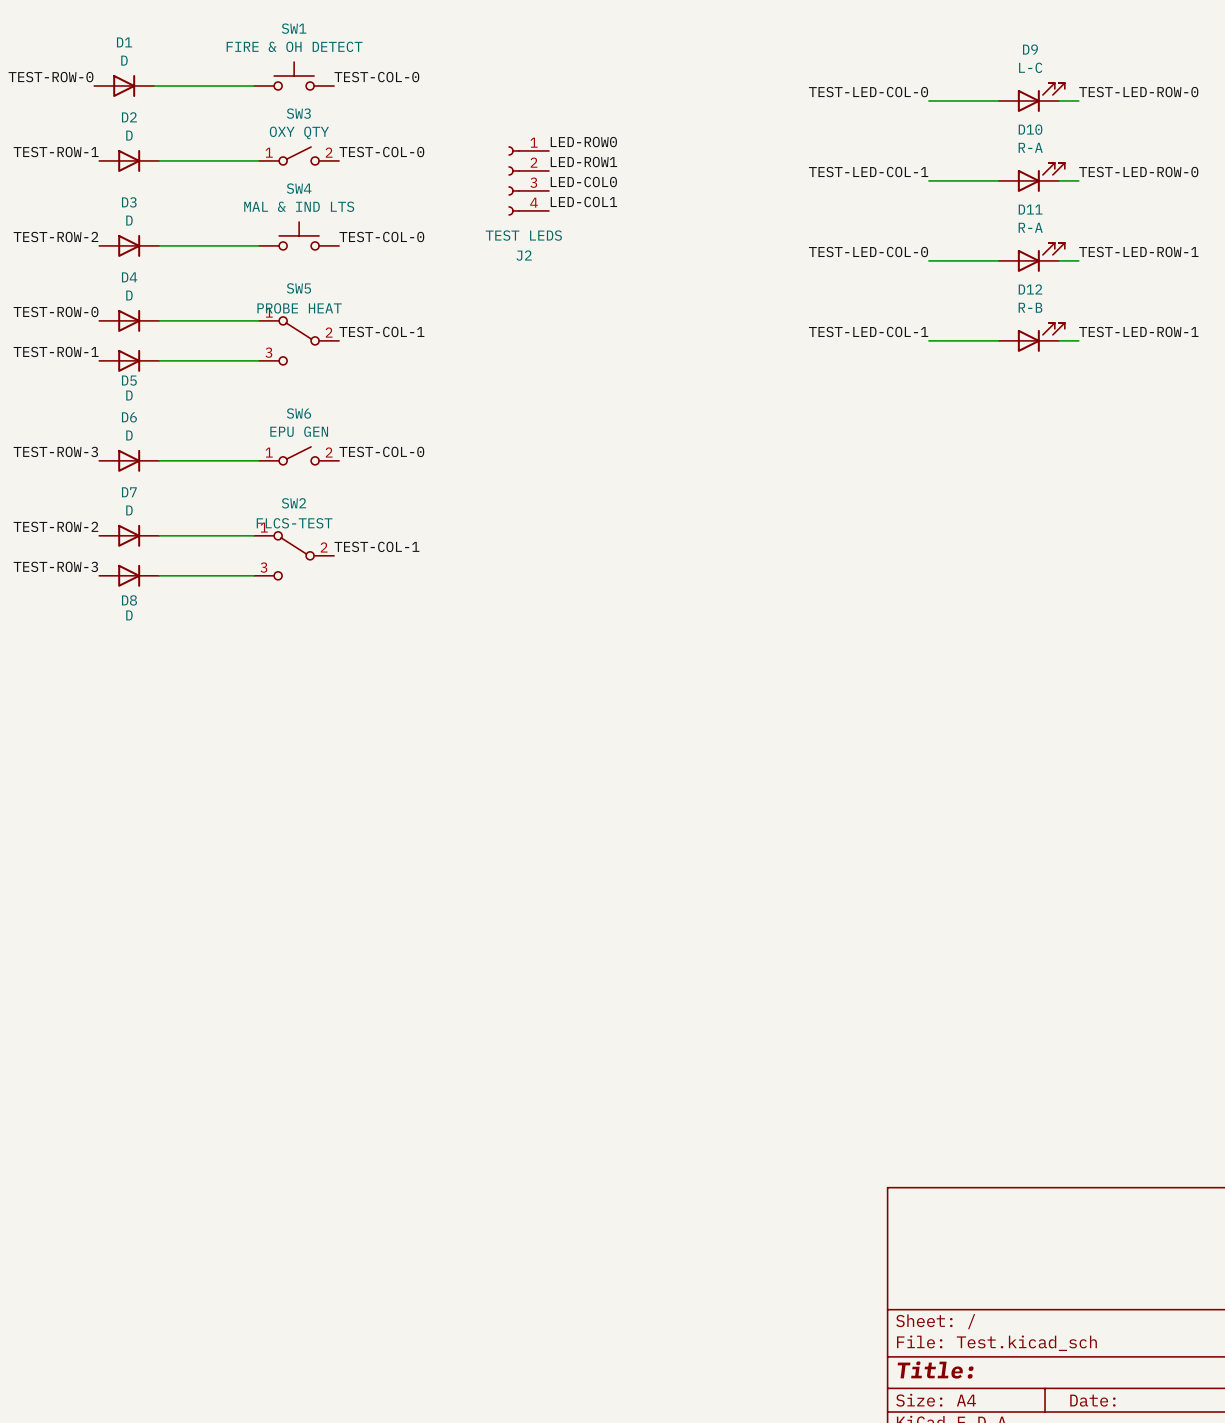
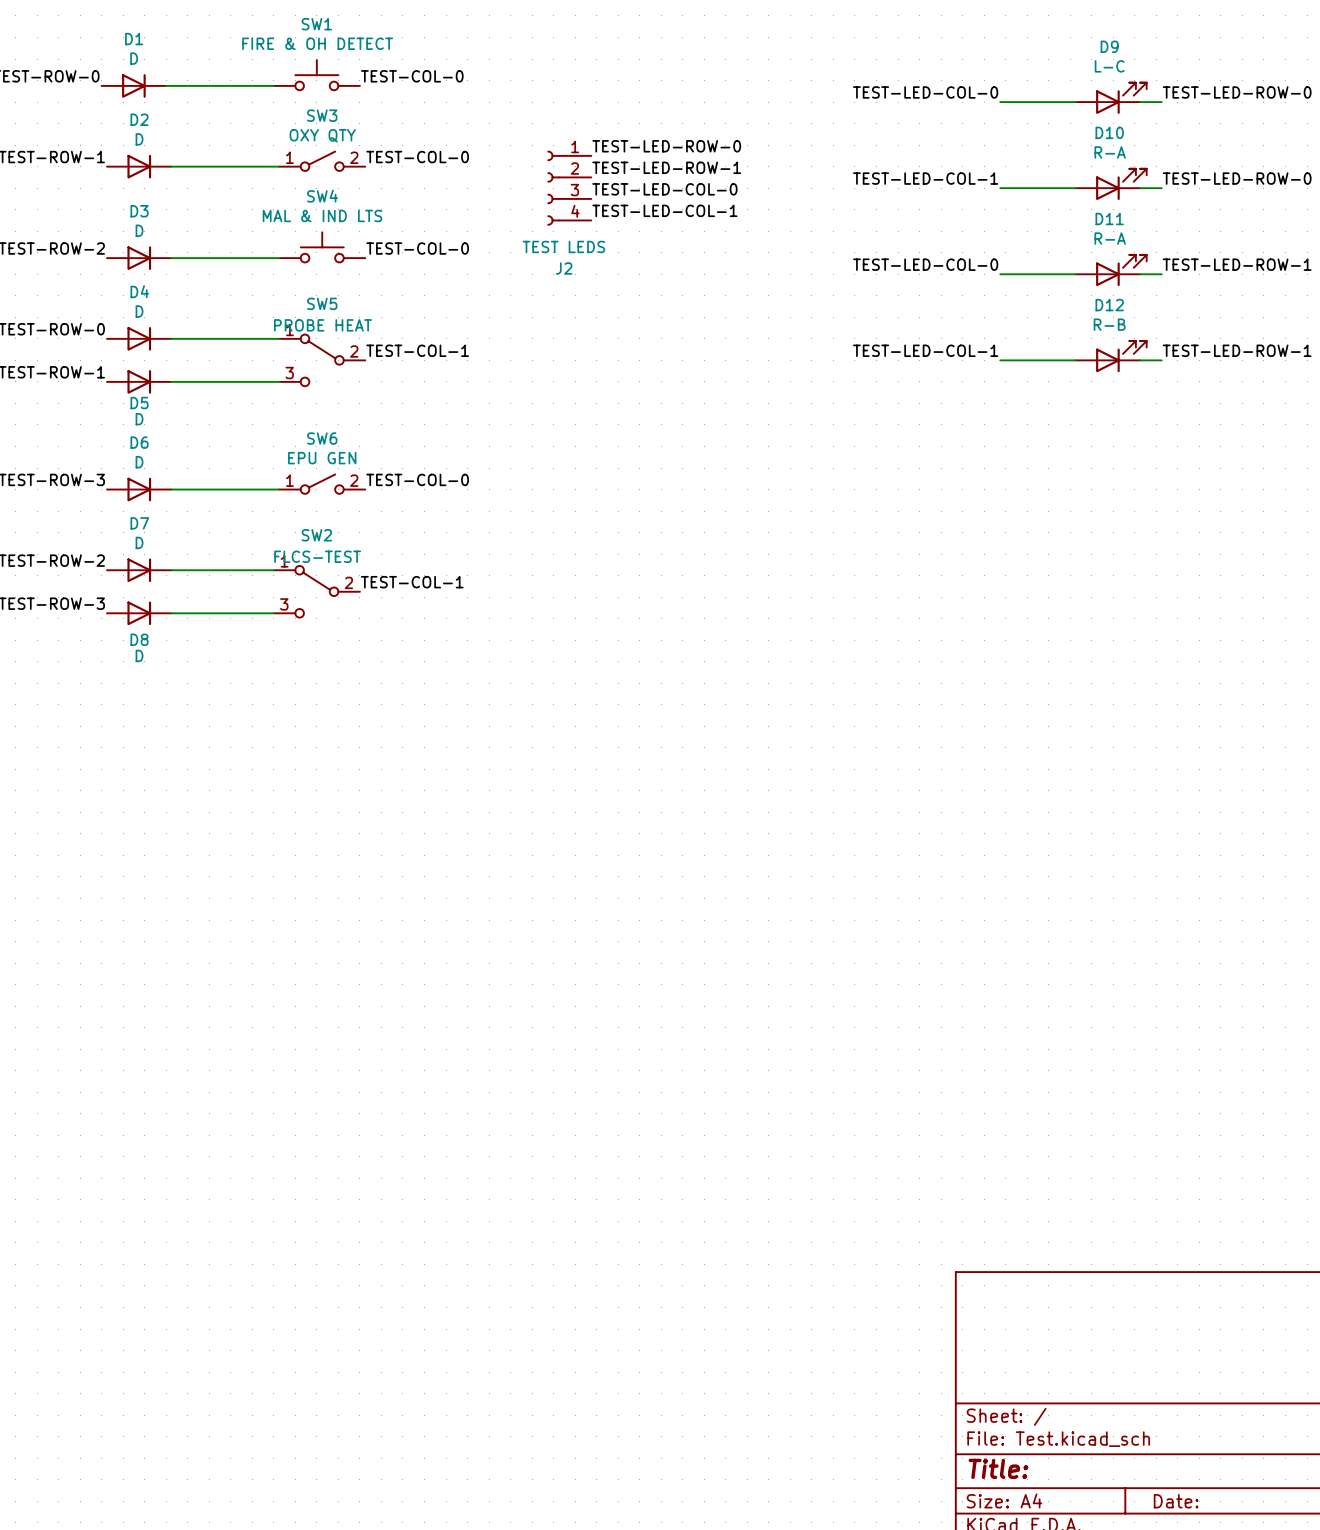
label: LED-ROW0 (583, 142) -> TEST-LED-ROW-0 (666, 146)
label: LED-ROW1 (583, 162) -> TEST-LED-ROW-1 (666, 167)
label: LED-COL0 (583, 182) -> TEST-LED-COL-0 (664, 189)
label: LED-COL1 (583, 202) -> TEST-LED-COL-1 (664, 210)

